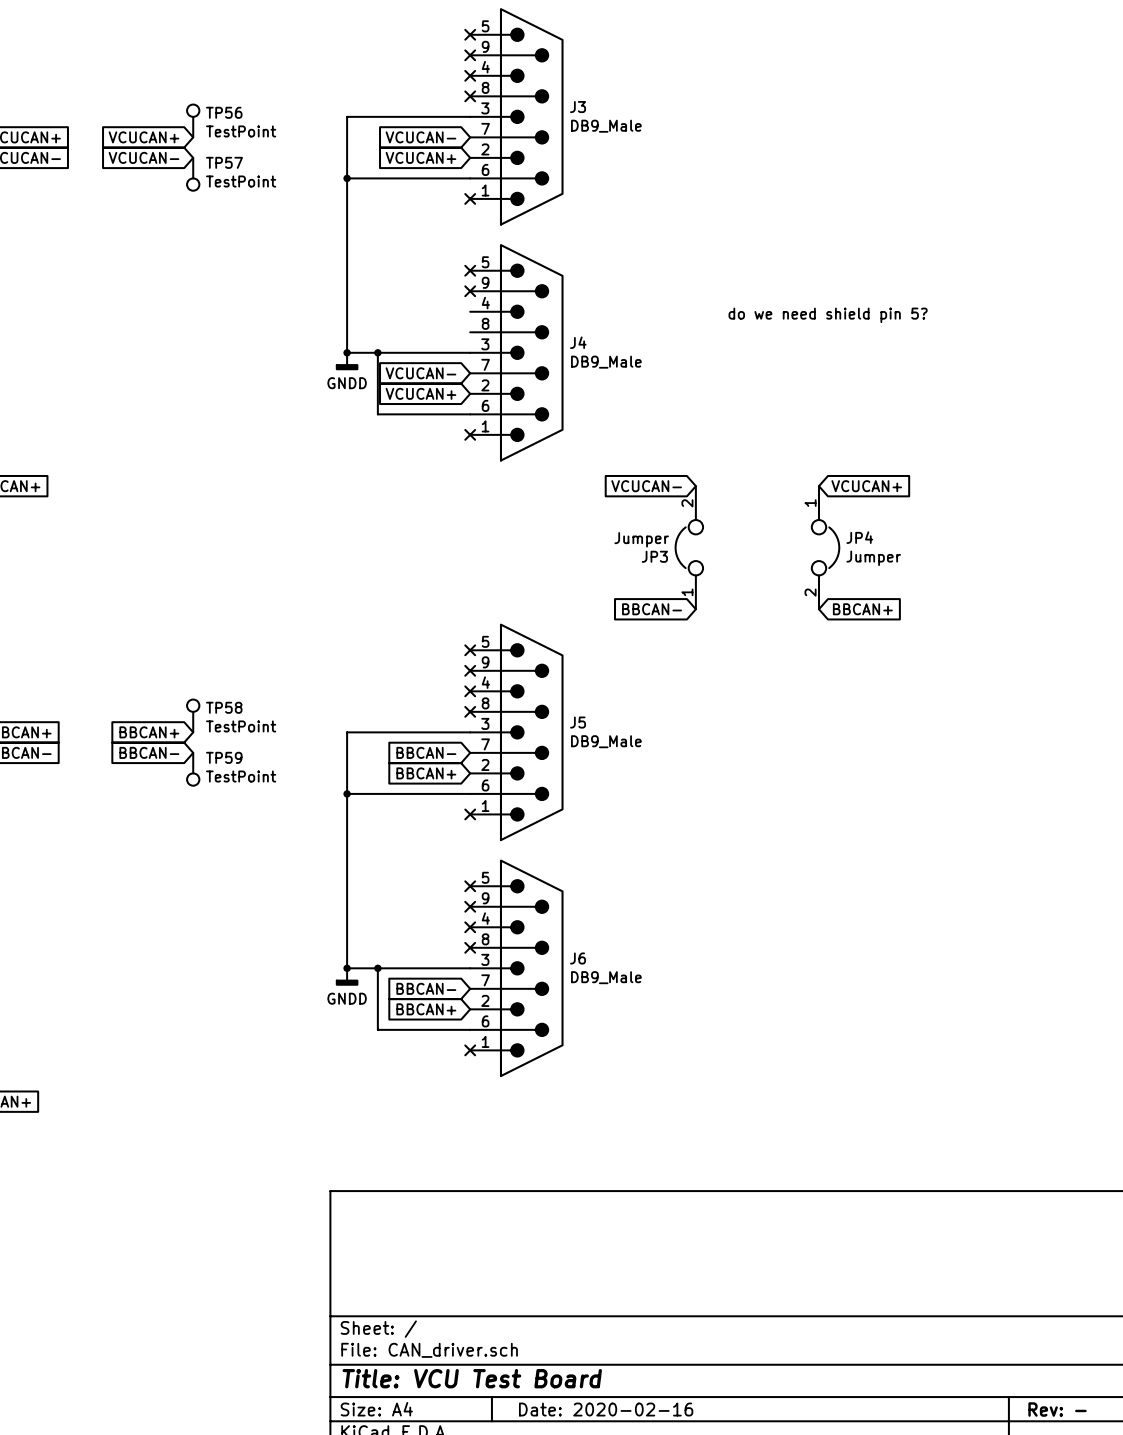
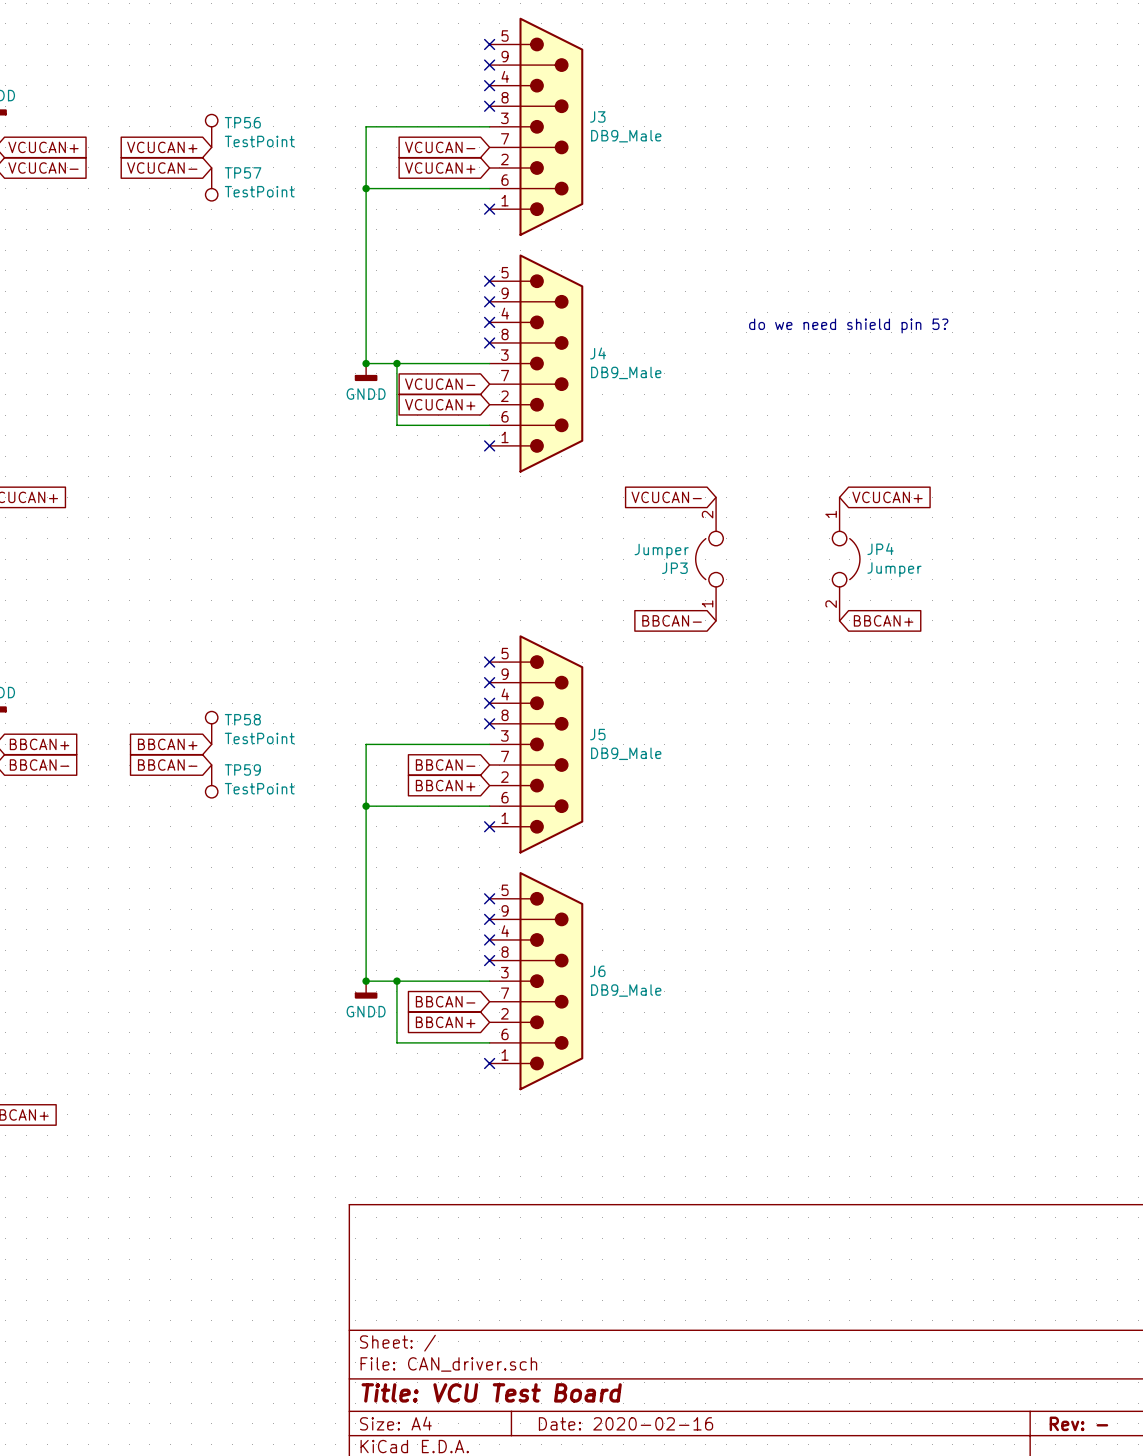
no-connect mark: none -> (489, 322)
no-connect mark: none -> (489, 342)

